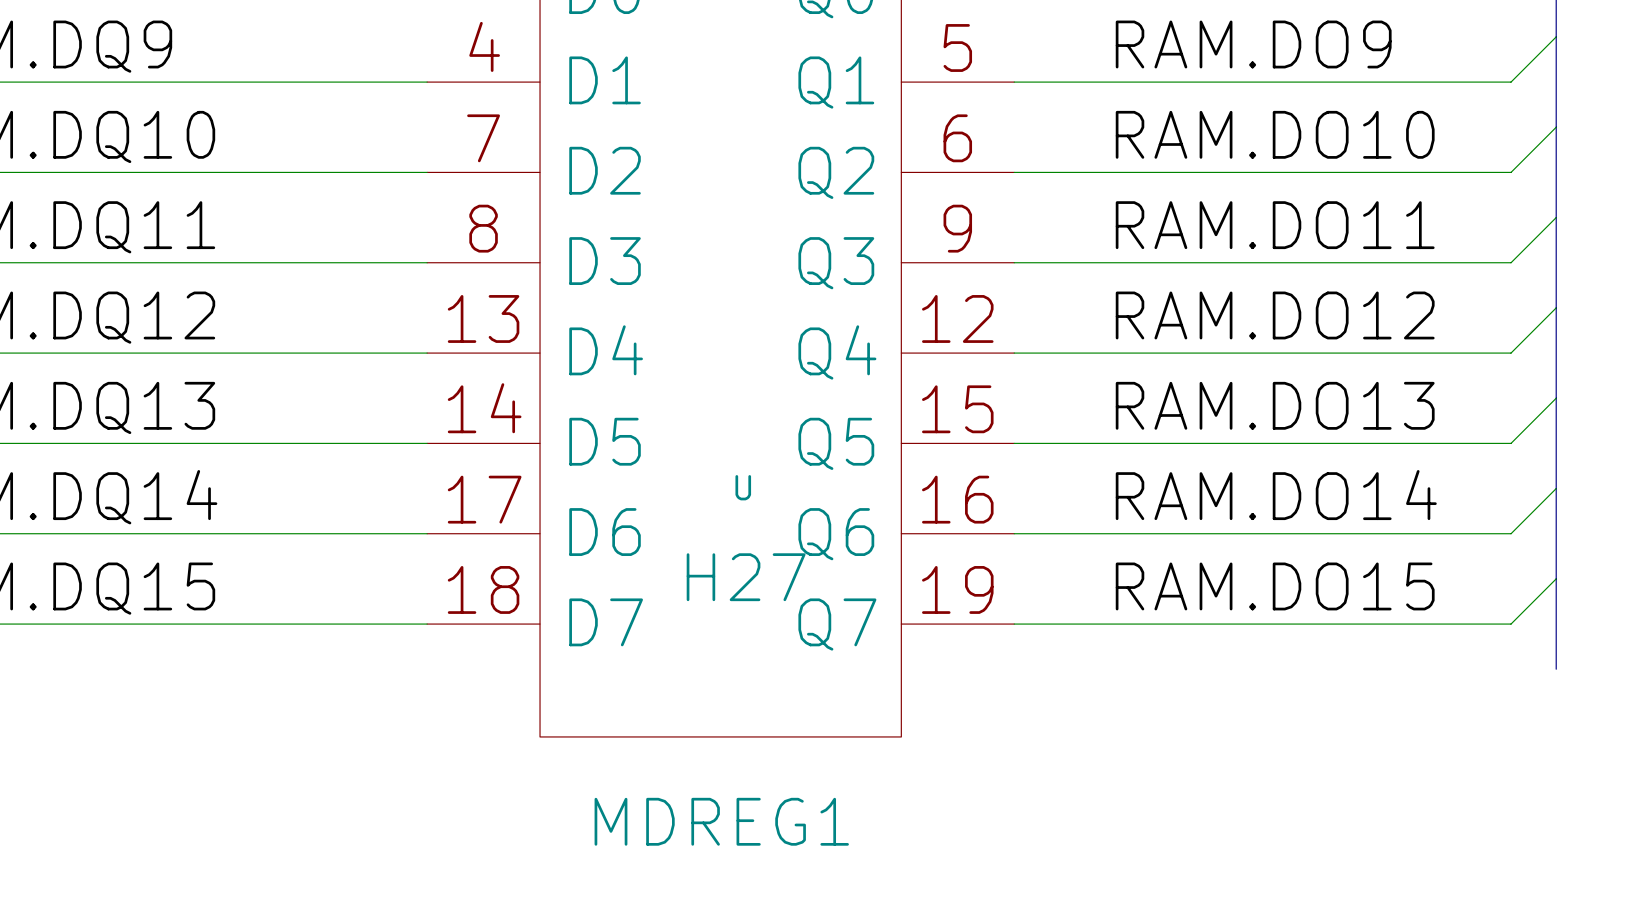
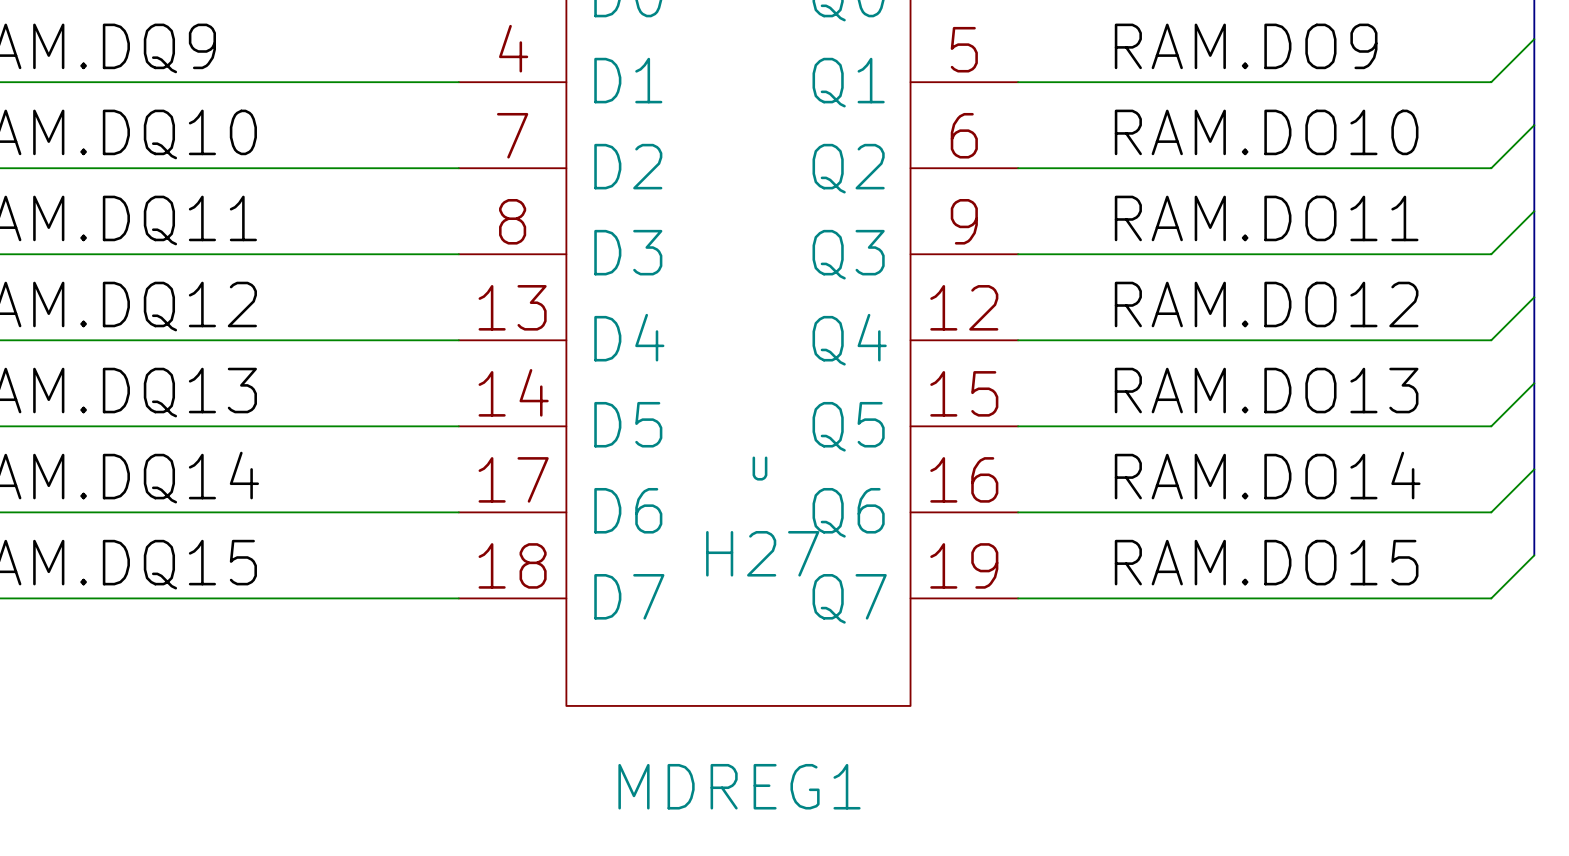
bus: (1556, 578) (1556, 669) -> none

